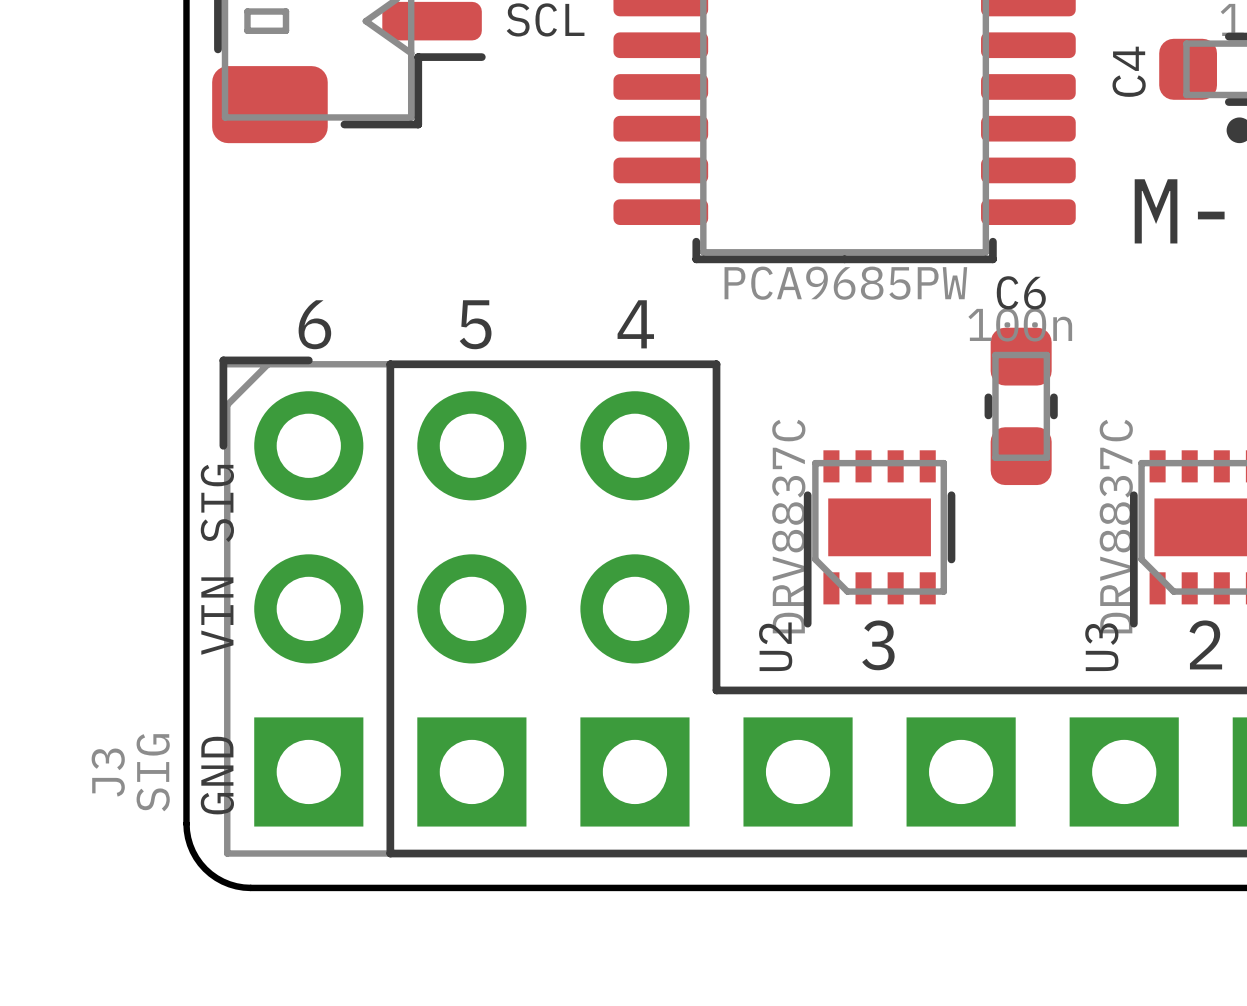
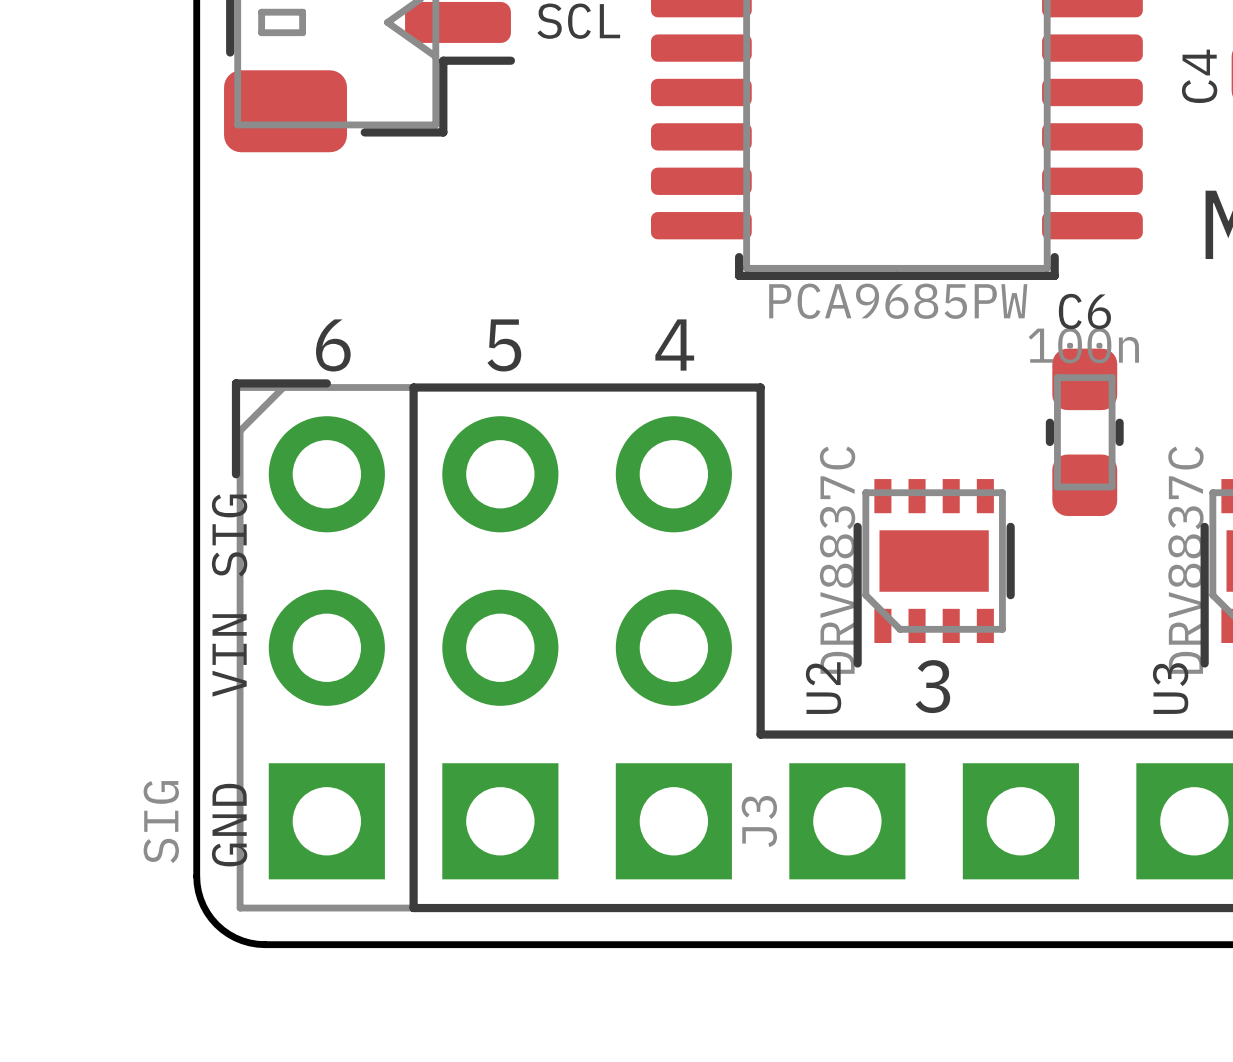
J3 name position: J3 (108, 772) -> J3 (759, 821)

